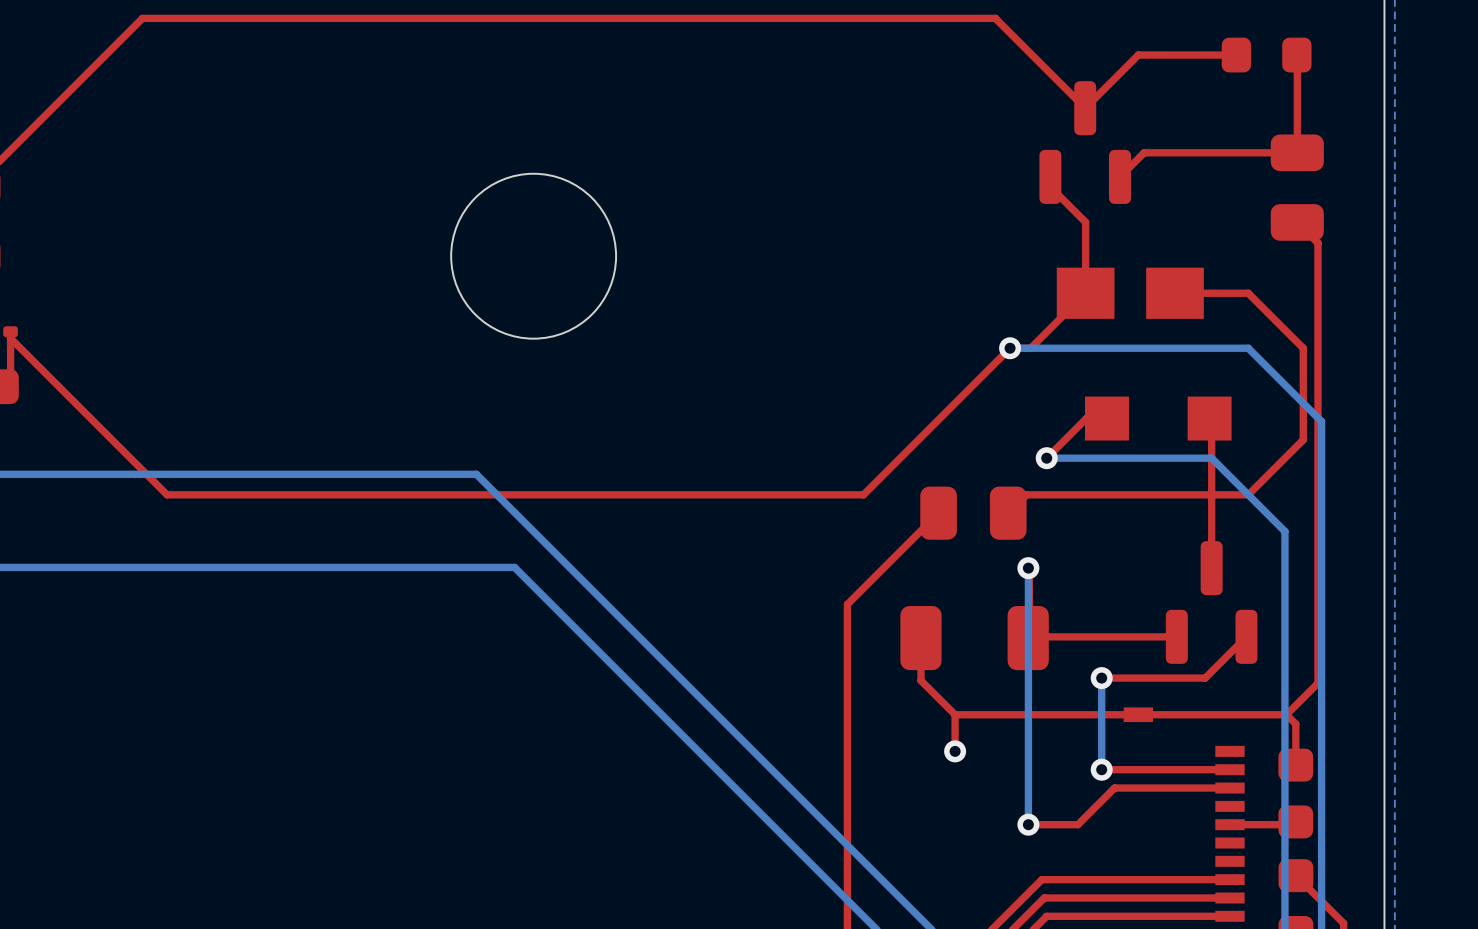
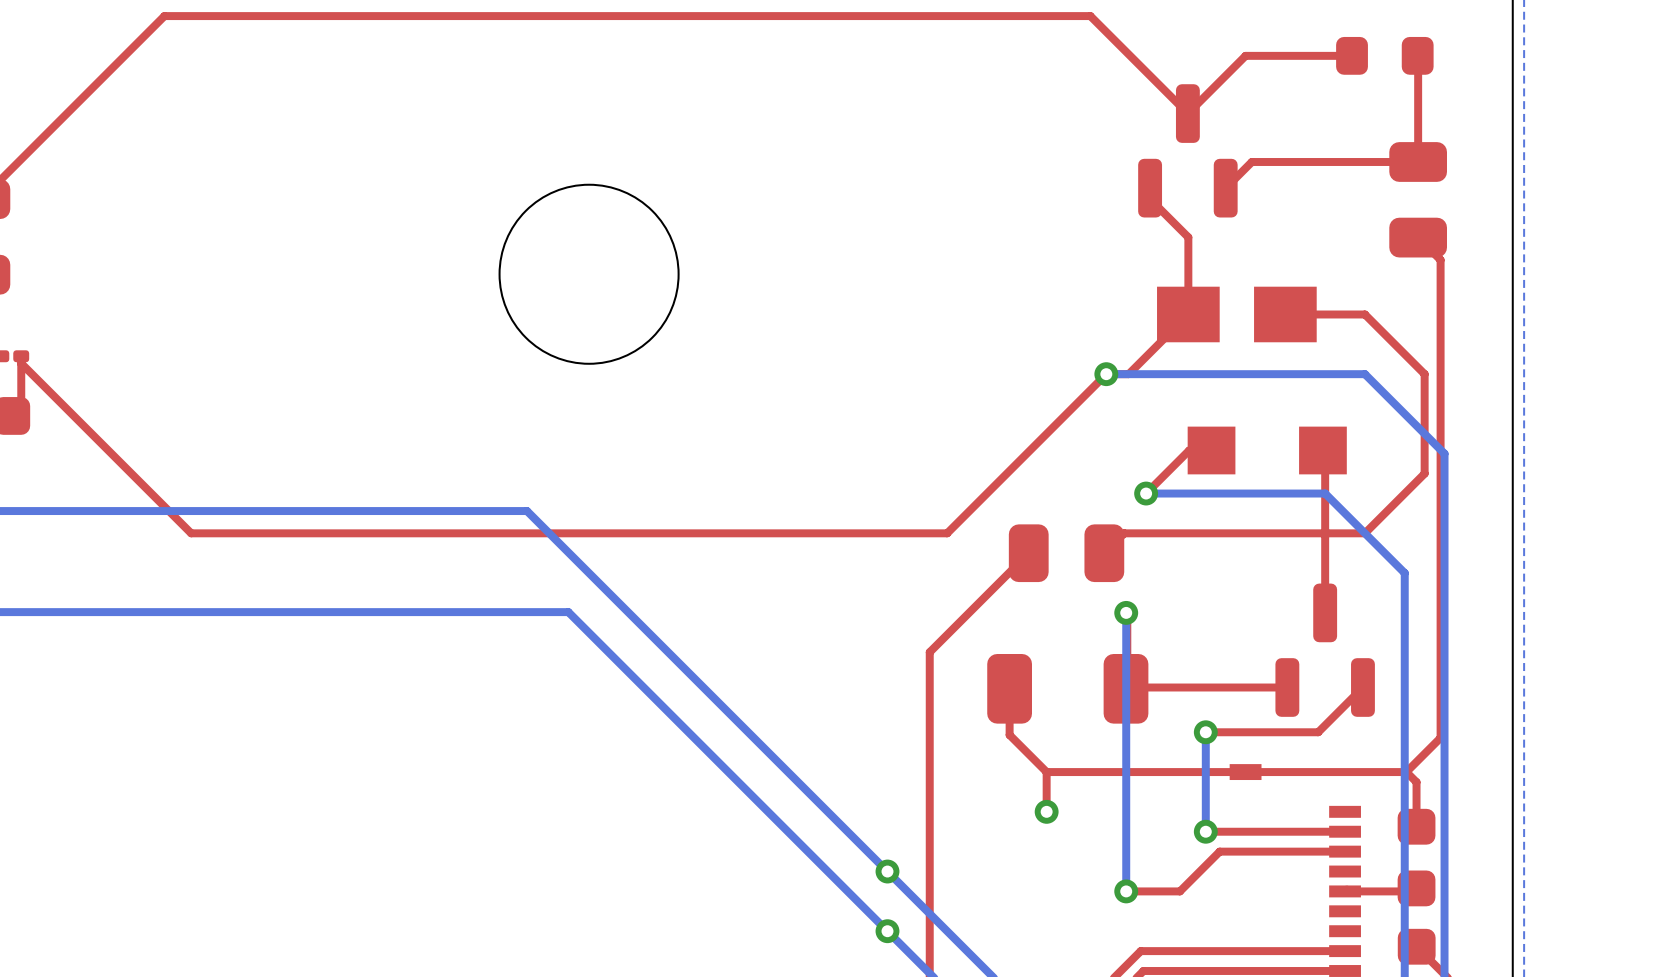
via: none -> (887, 871)
via: none -> (887, 931)

